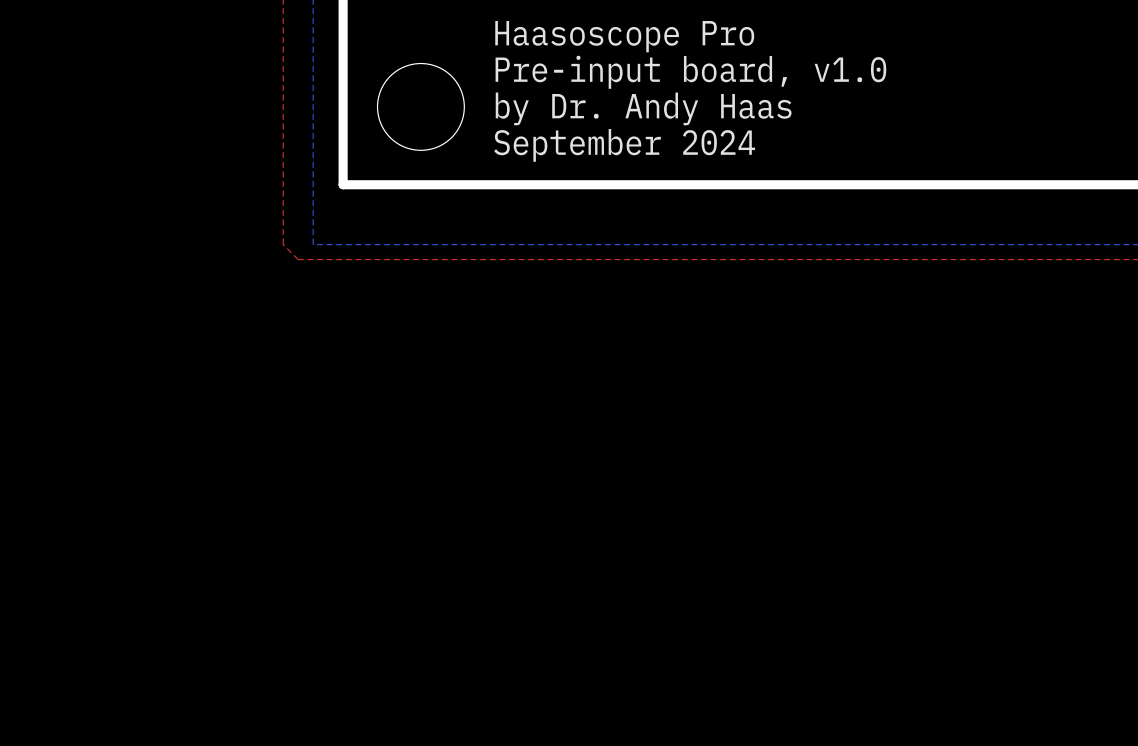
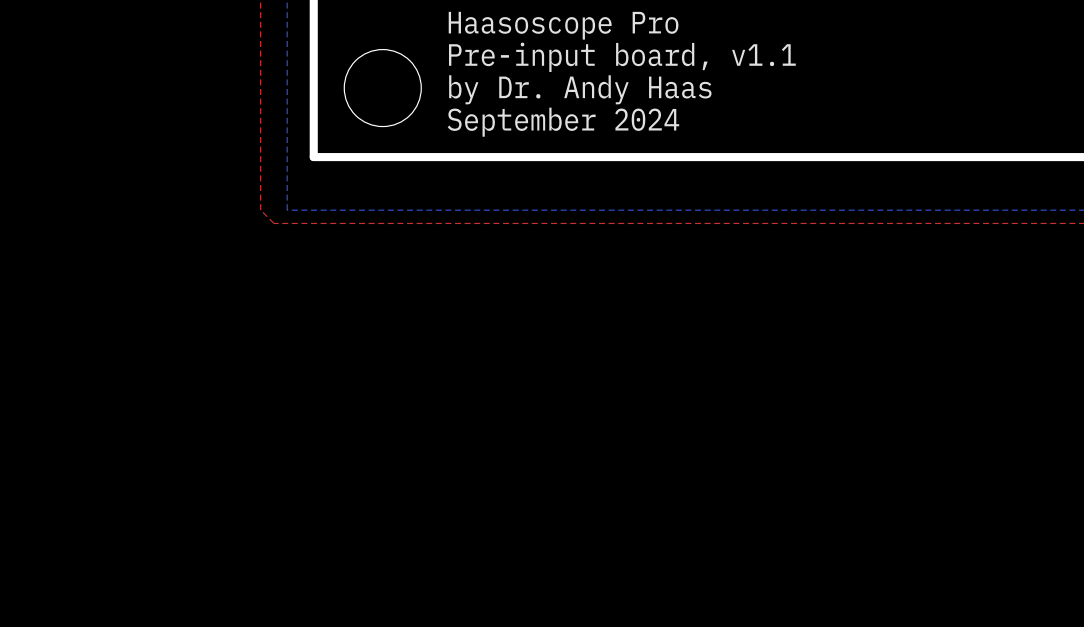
text: Pre-input board, v1.0 (690, 72) -> Pre-input board, v1.1 (622, 57)

